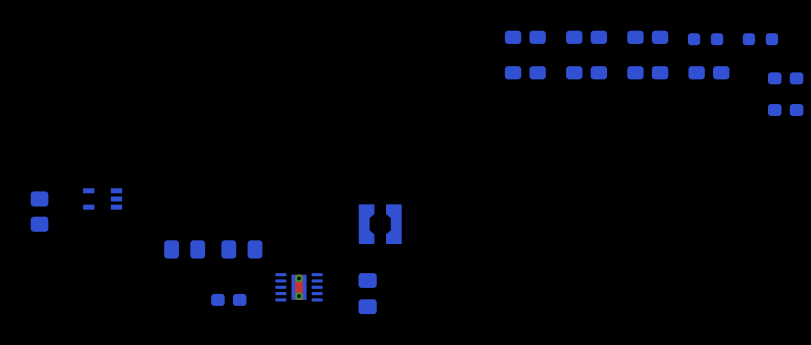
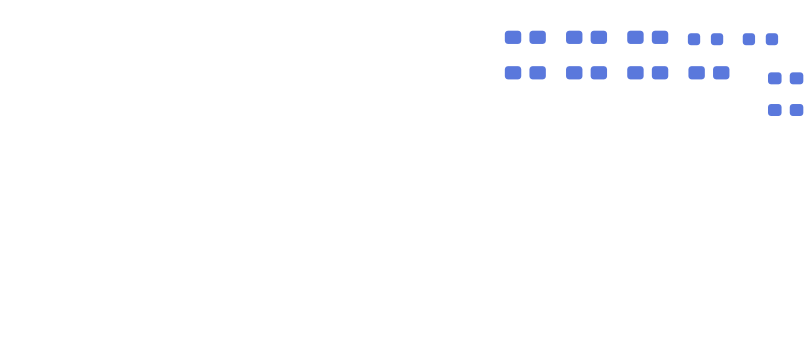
part: (102, 198) -> none
part: (39, 211) -> none
part: (380, 224) -> none
part: (184, 249) -> none
part: (241, 249) -> none
part: (299, 287) -> none
part: (367, 293) -> none
part: (228, 299) -> none

